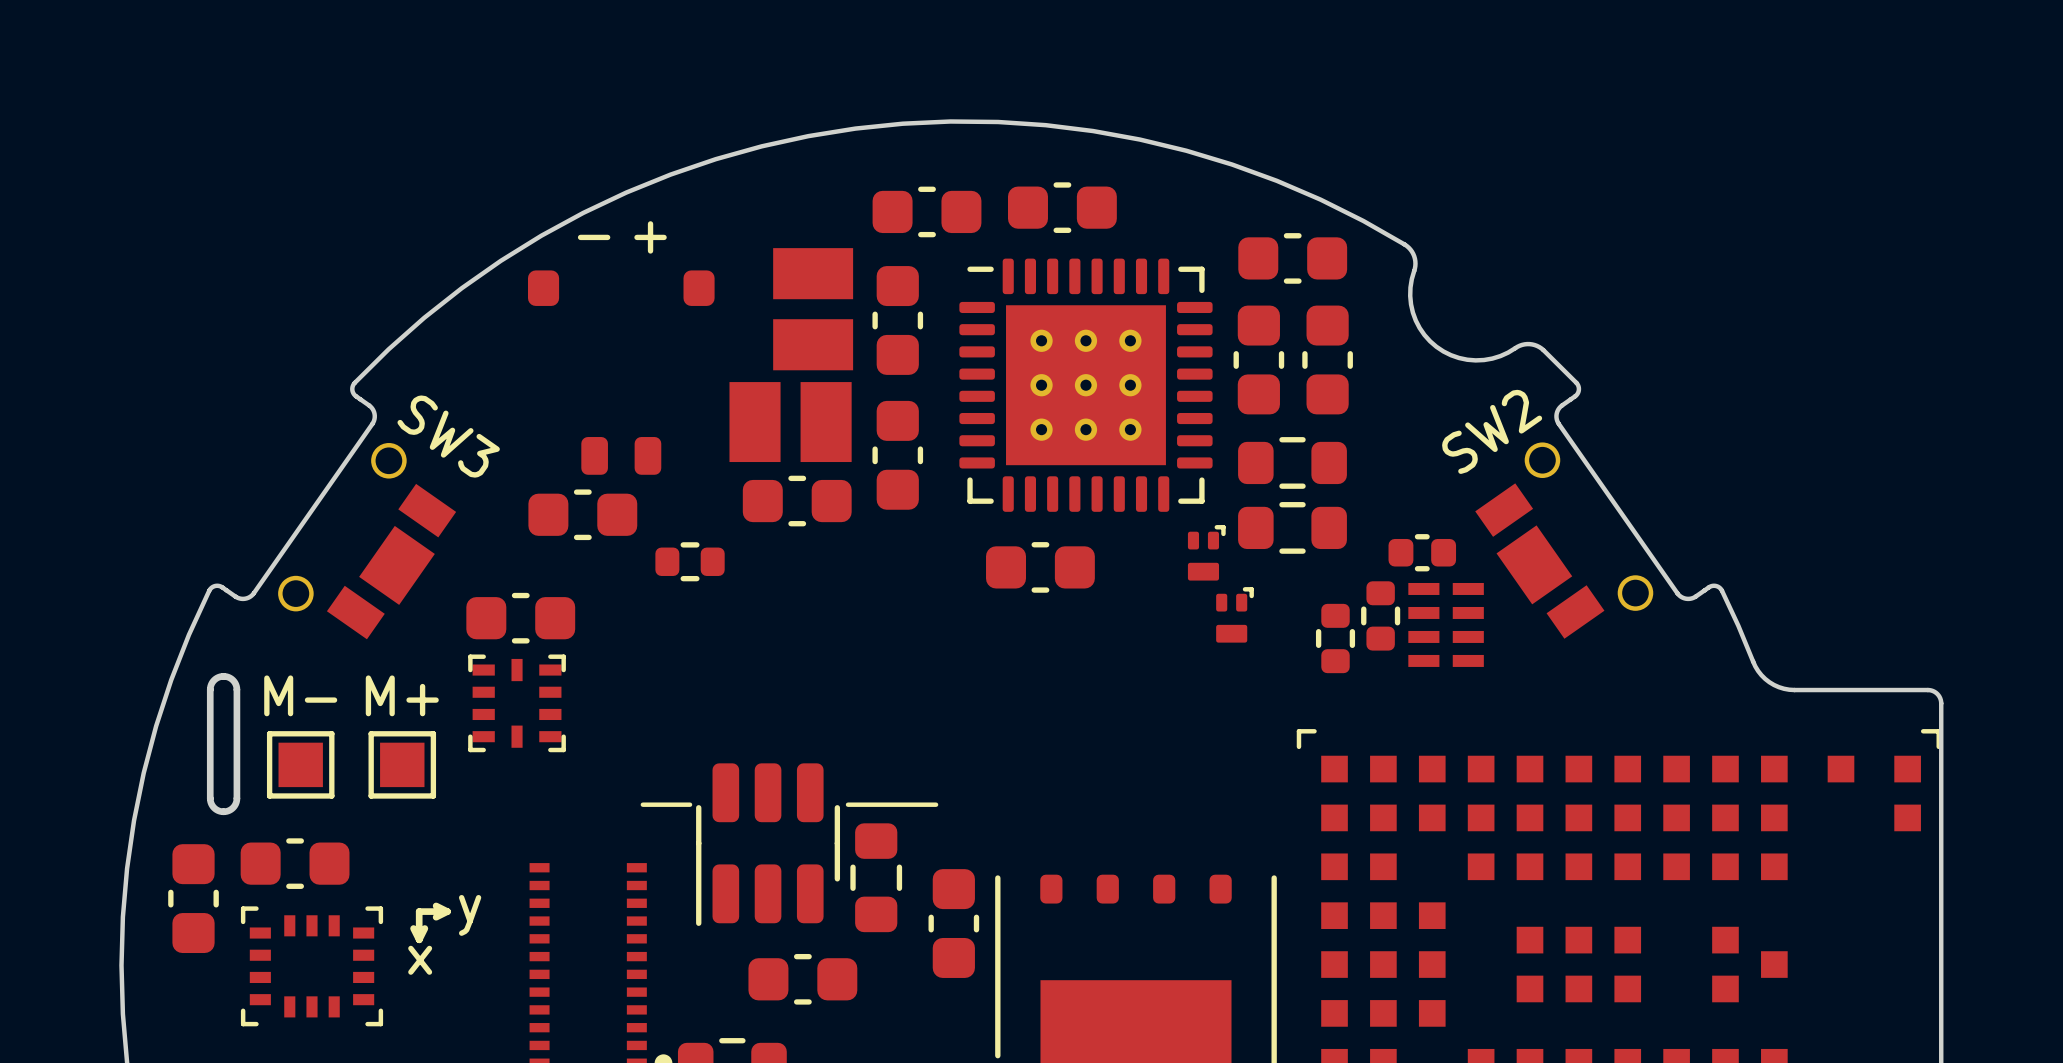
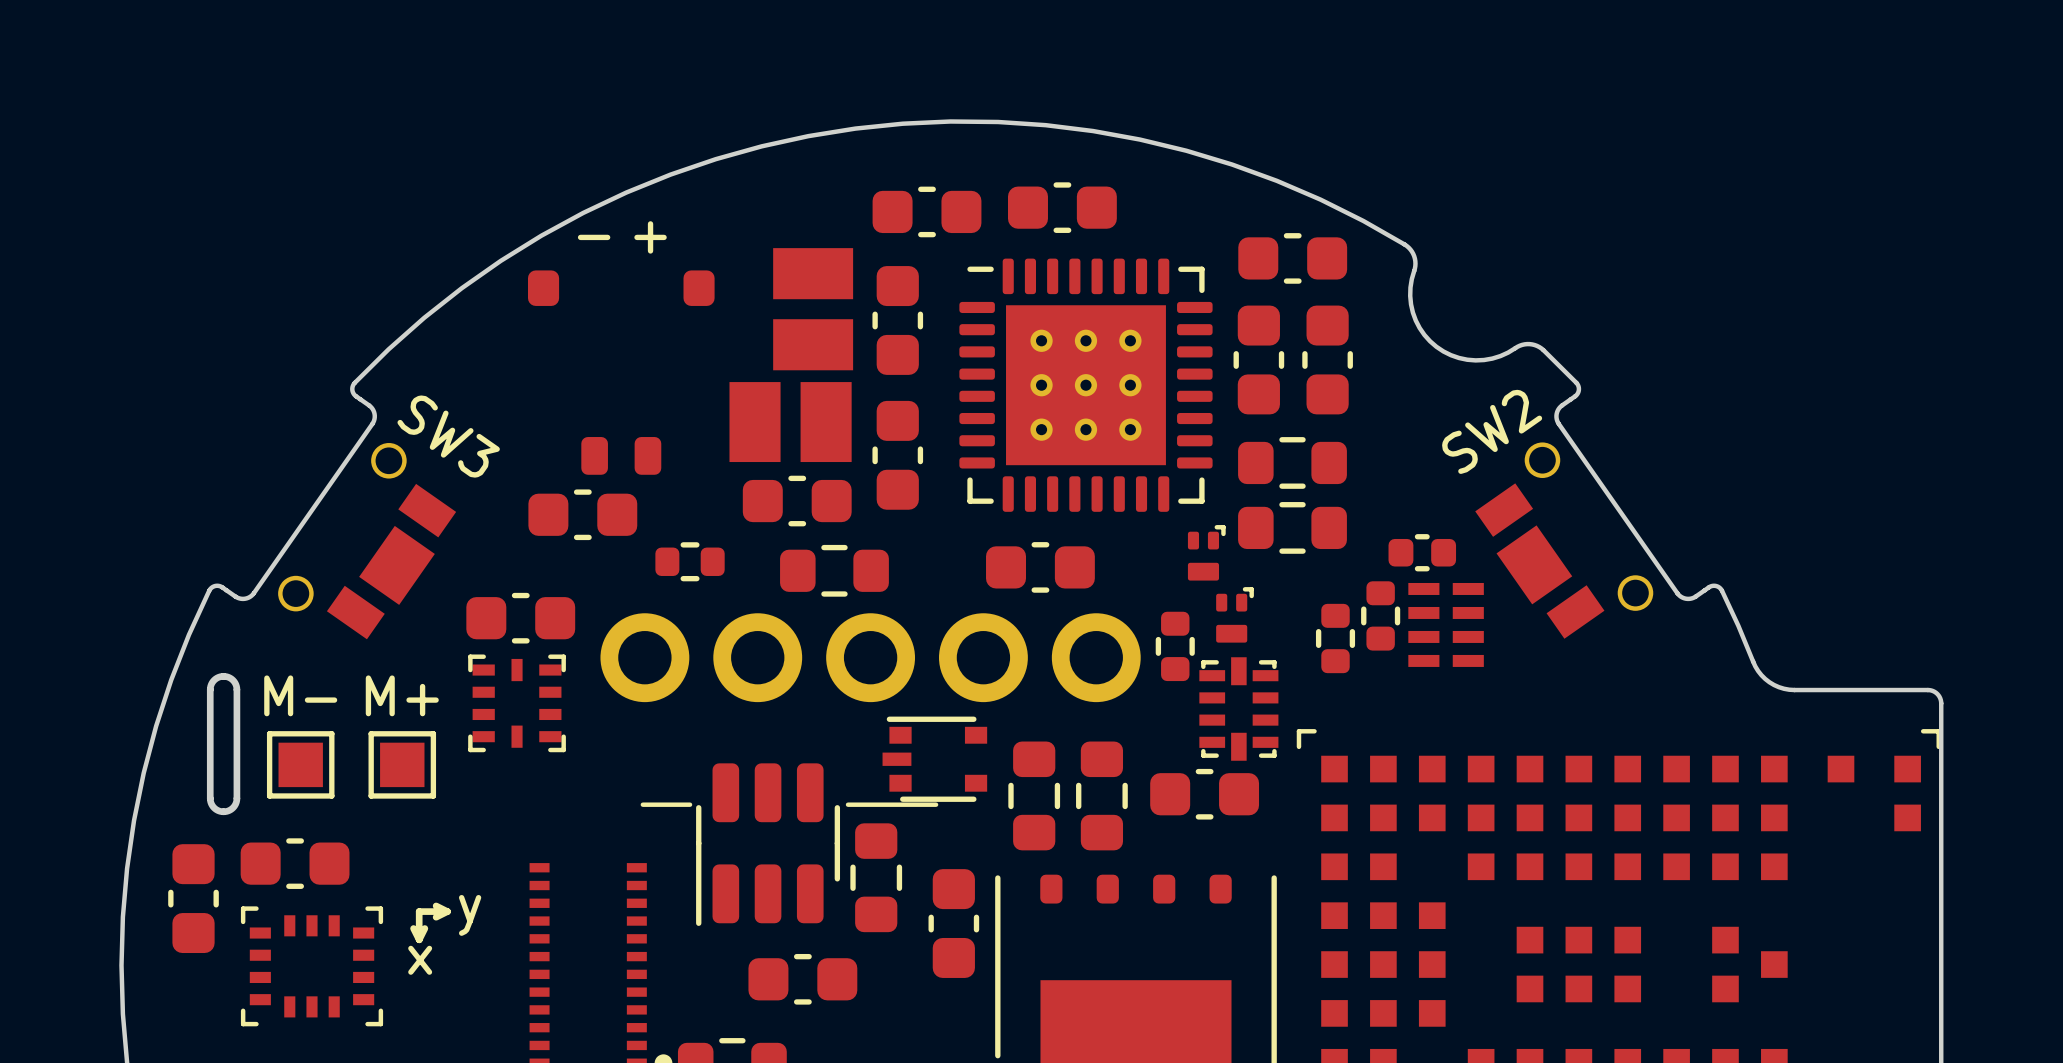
part: none -> (834, 570)
part: none -> (1175, 646)
part: none -> (870, 657)
part: none -> (1238, 709)
part: none -> (934, 759)
part: none -> (1204, 794)
part: none -> (1034, 795)
part: none -> (1101, 795)

